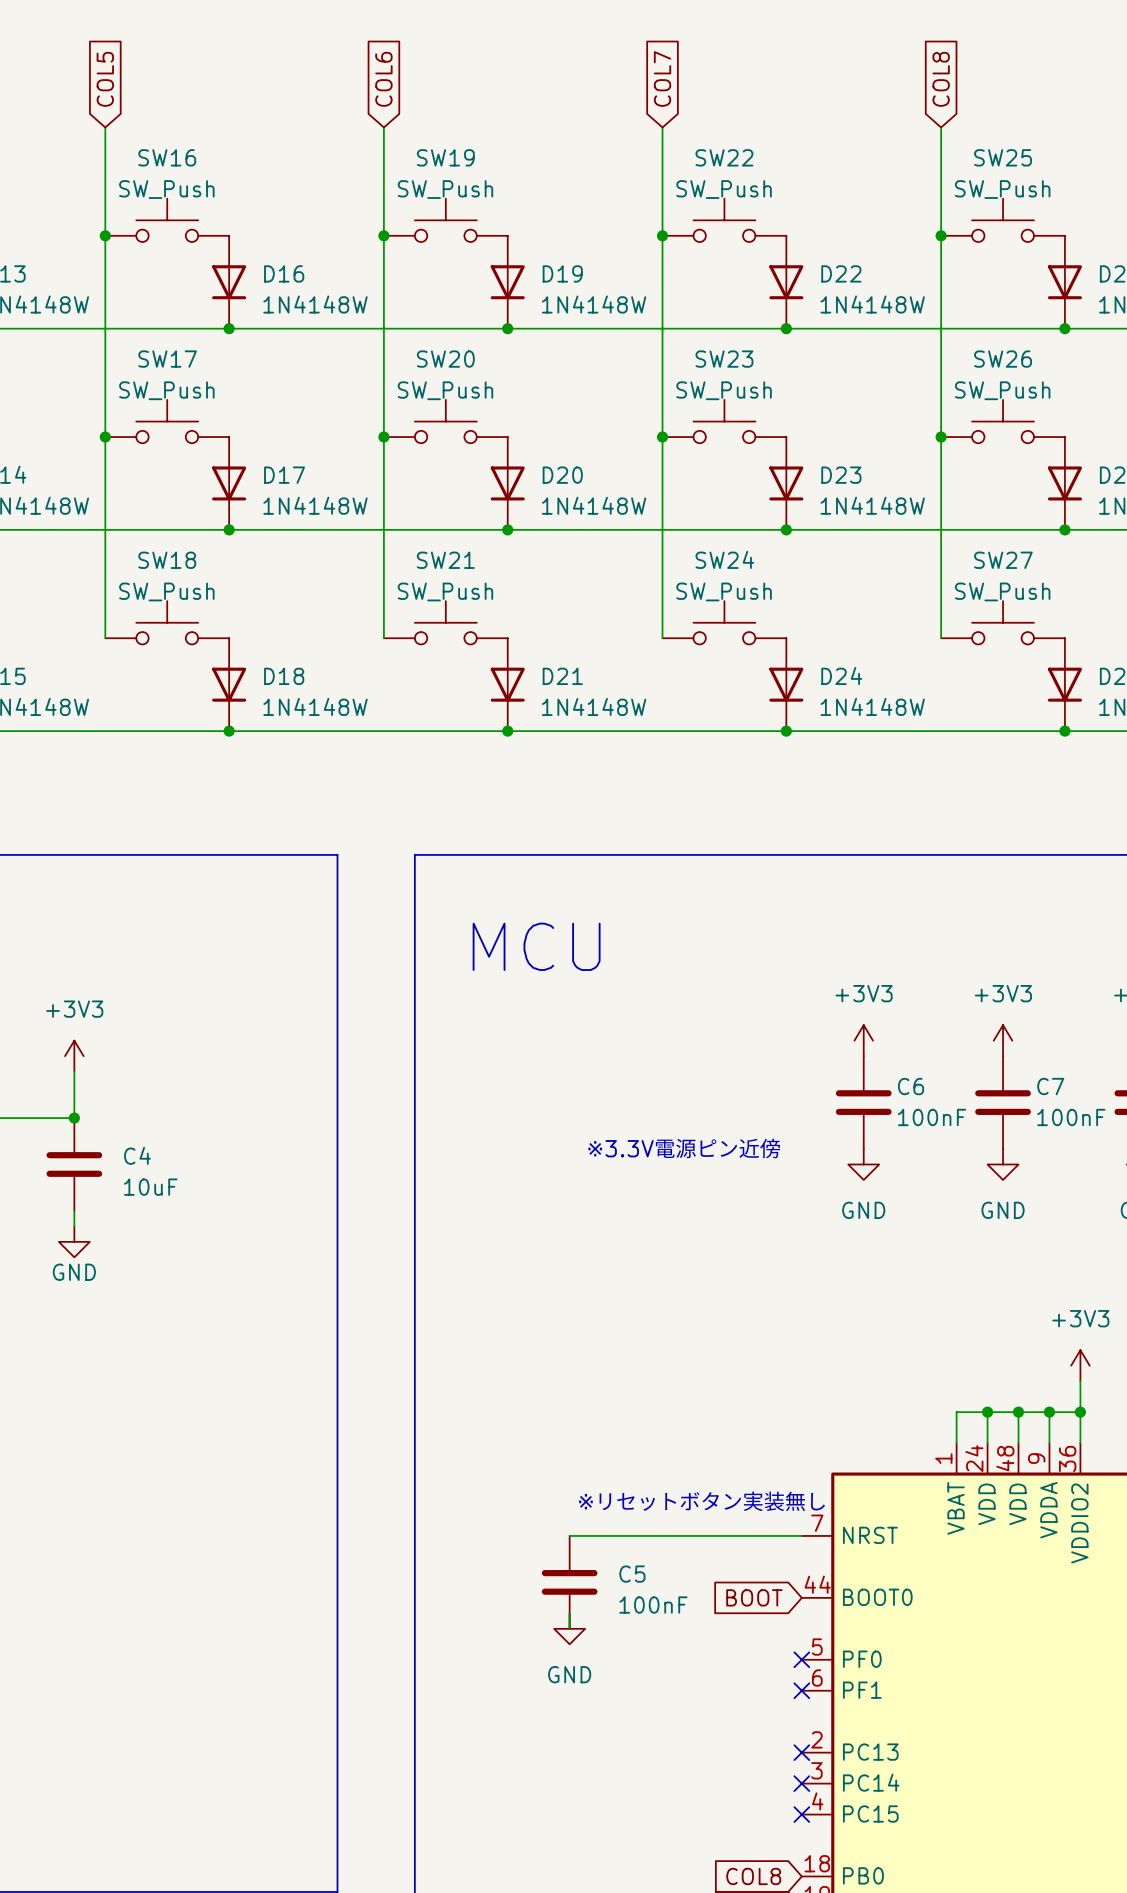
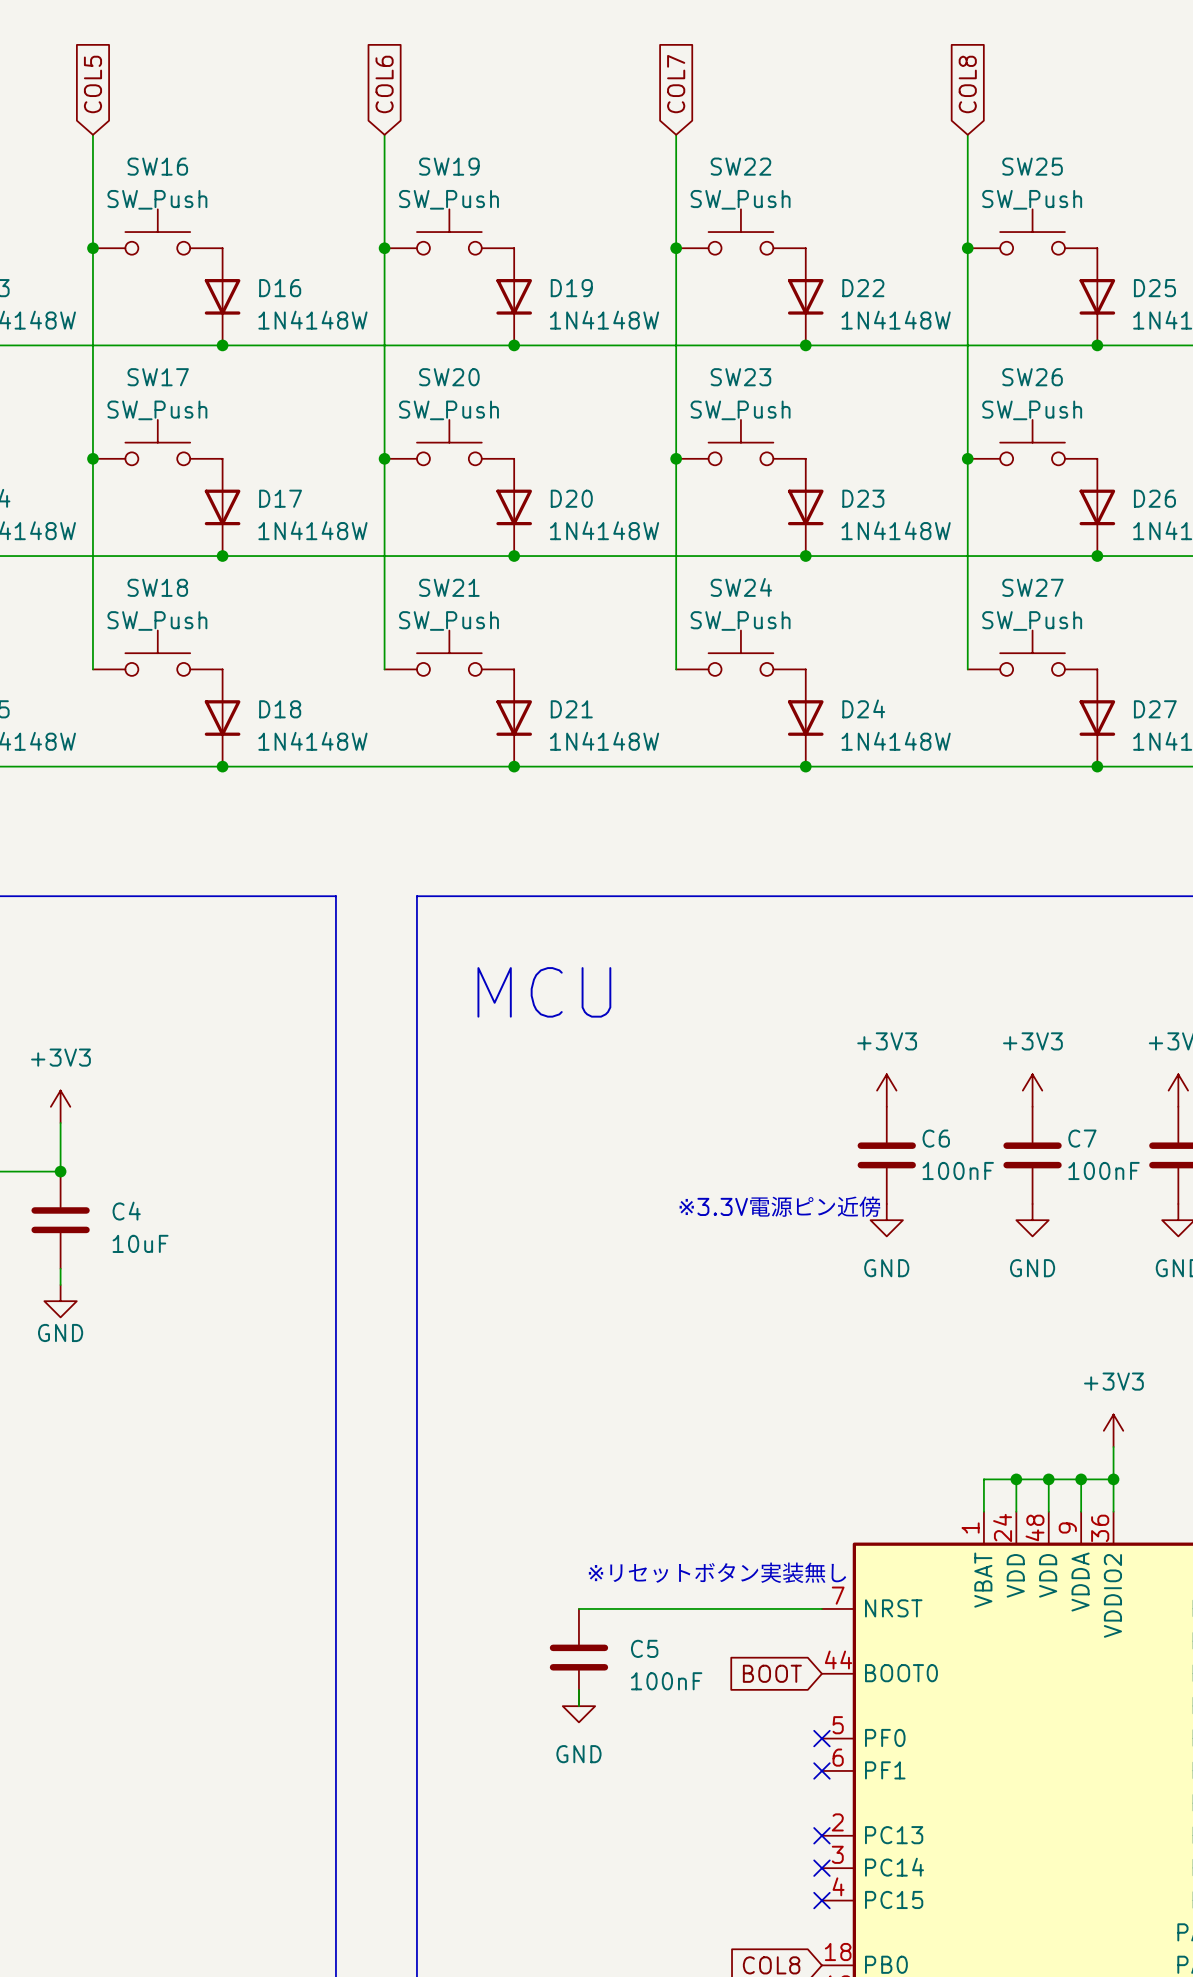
text position: ※3.3V電源ピン近傍 (684, 1148) -> ※3.3V電源ピン近傍 (779, 1206)

